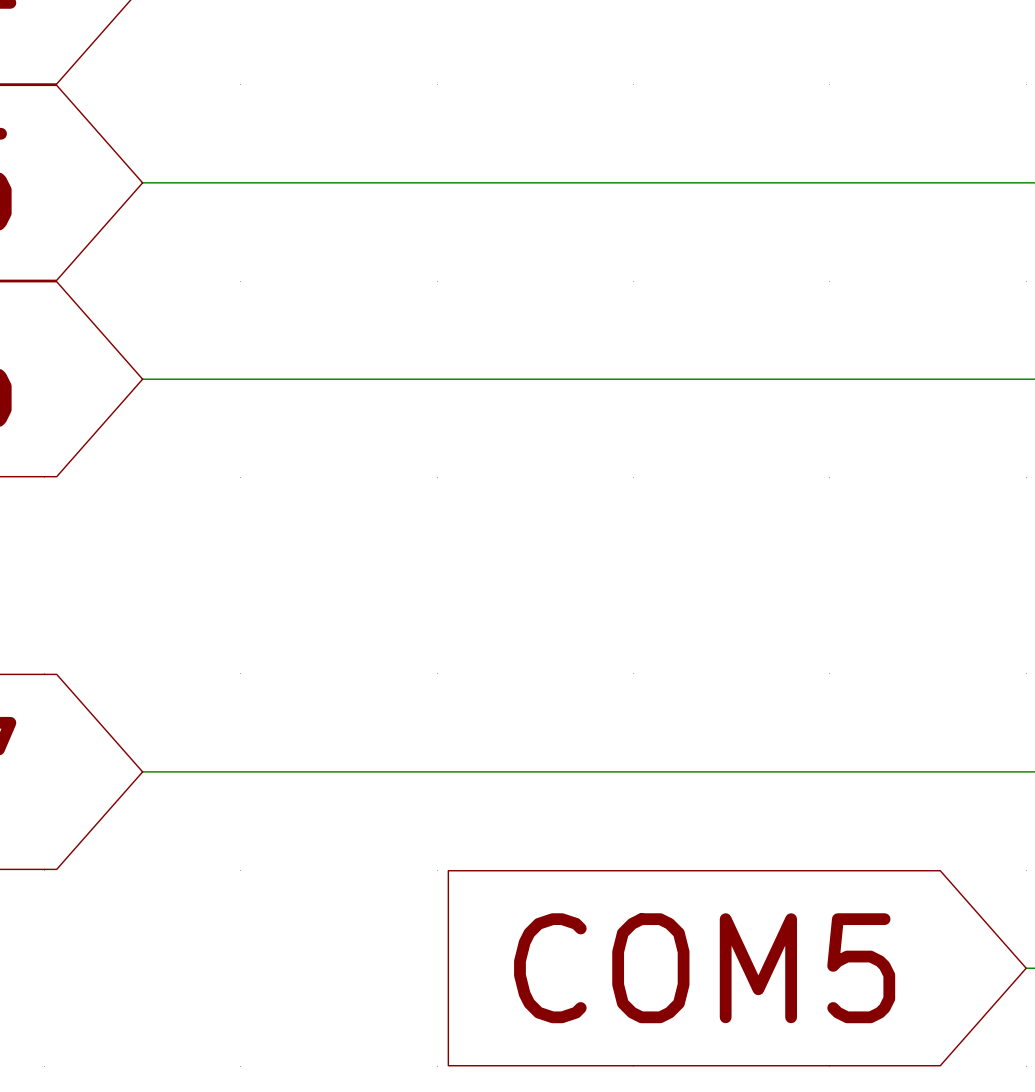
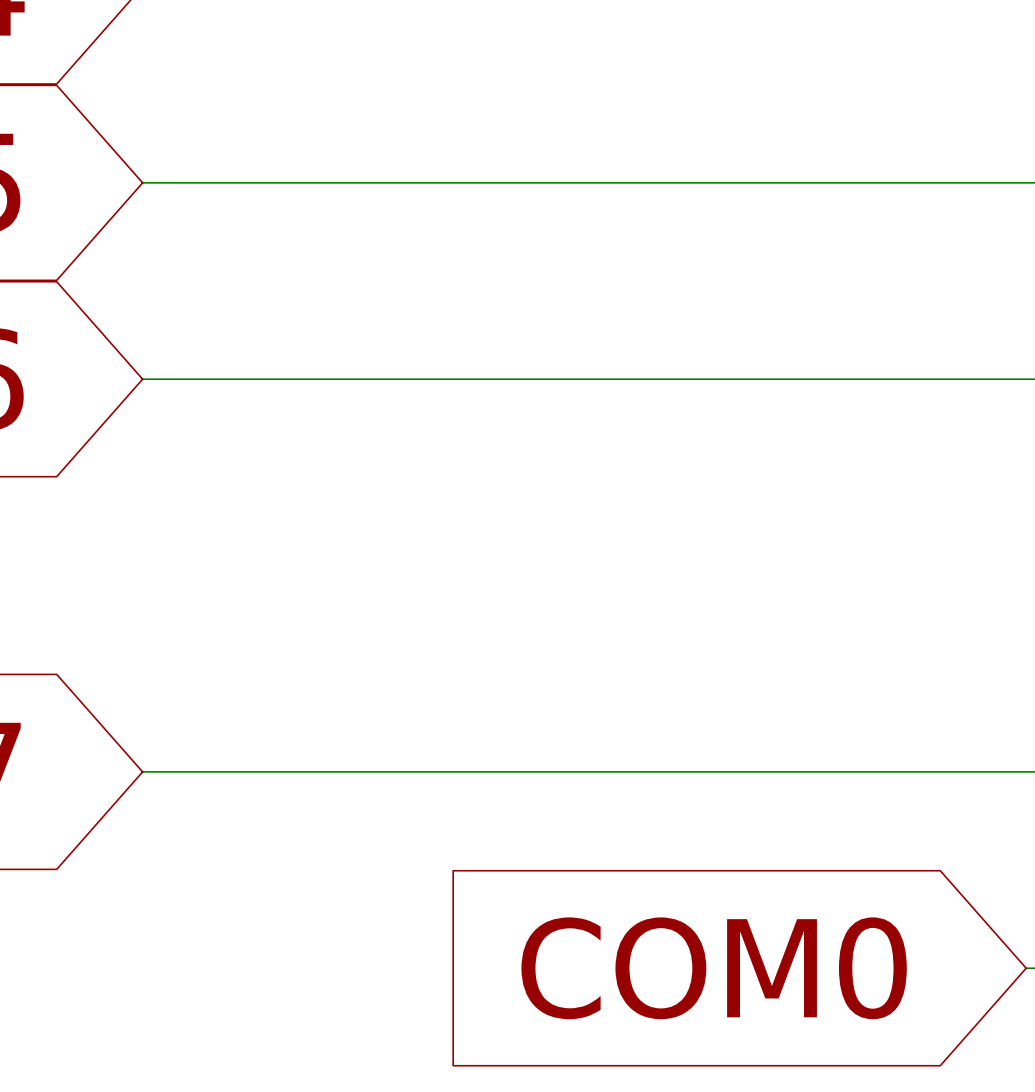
global label: COM5 (704, 968) -> COM0 (714, 968)

